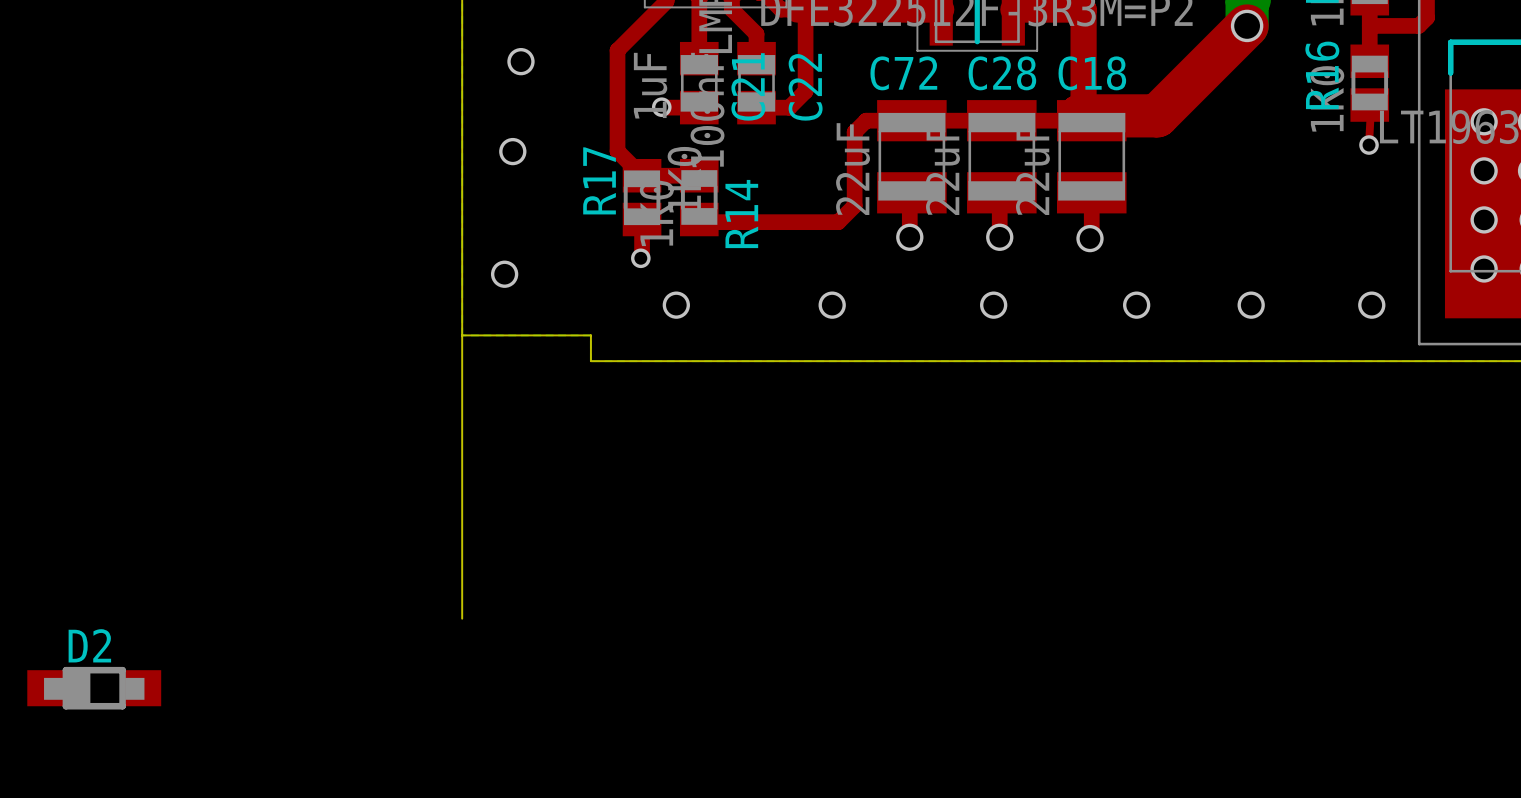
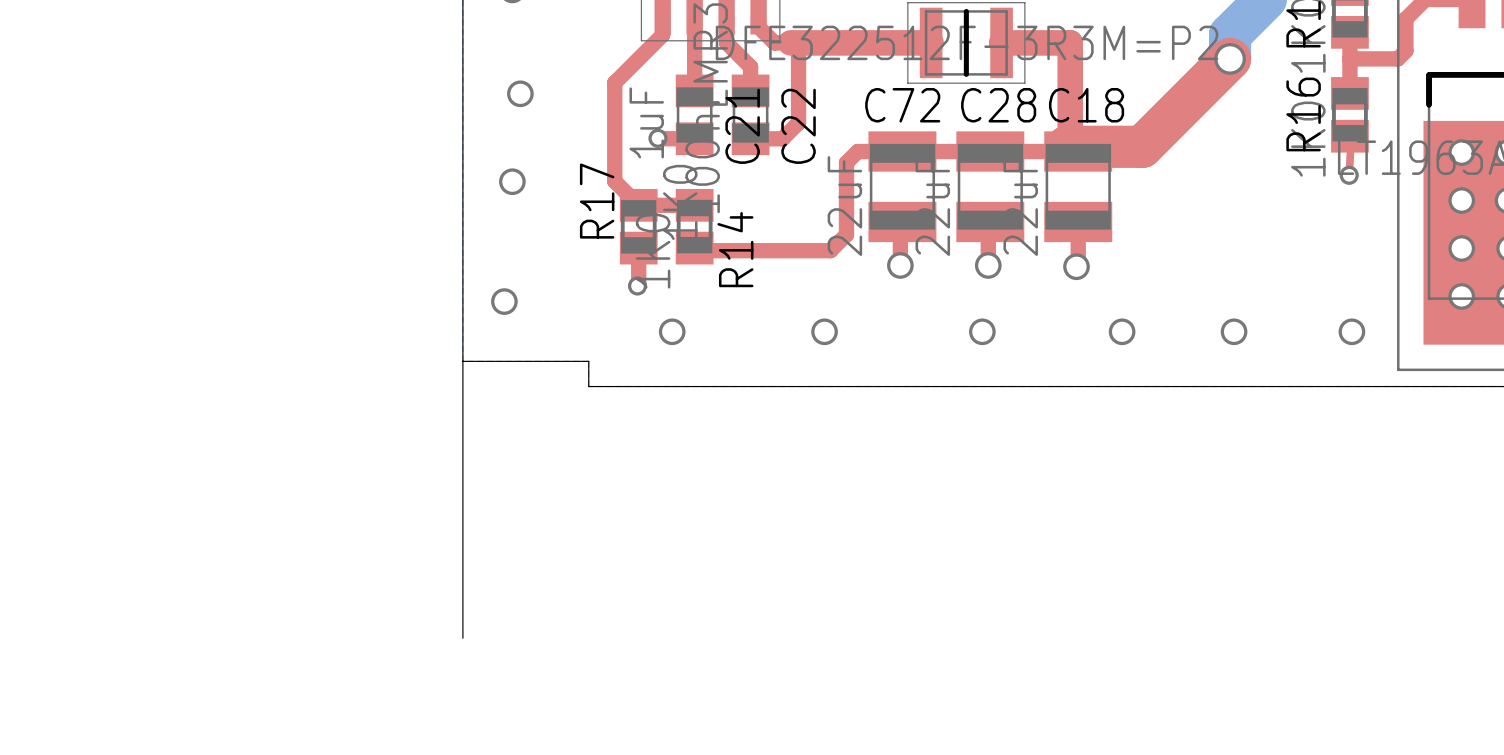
D2: (94, 688) -> none

